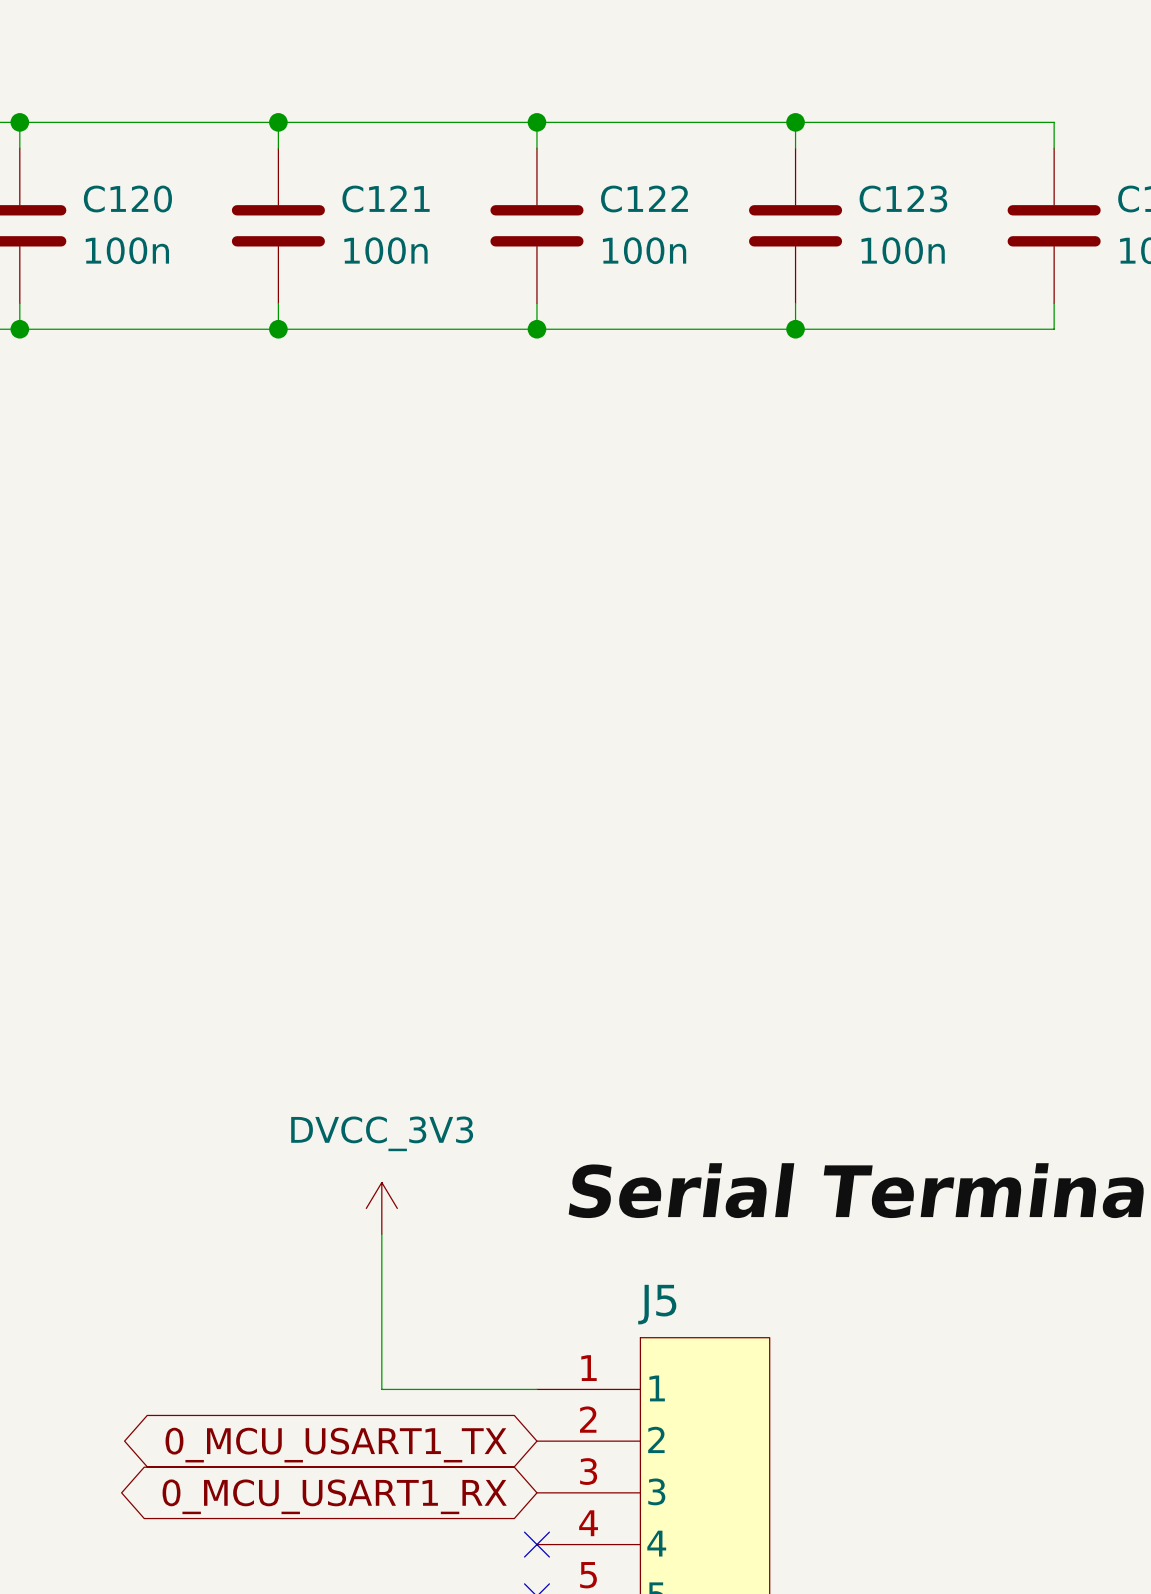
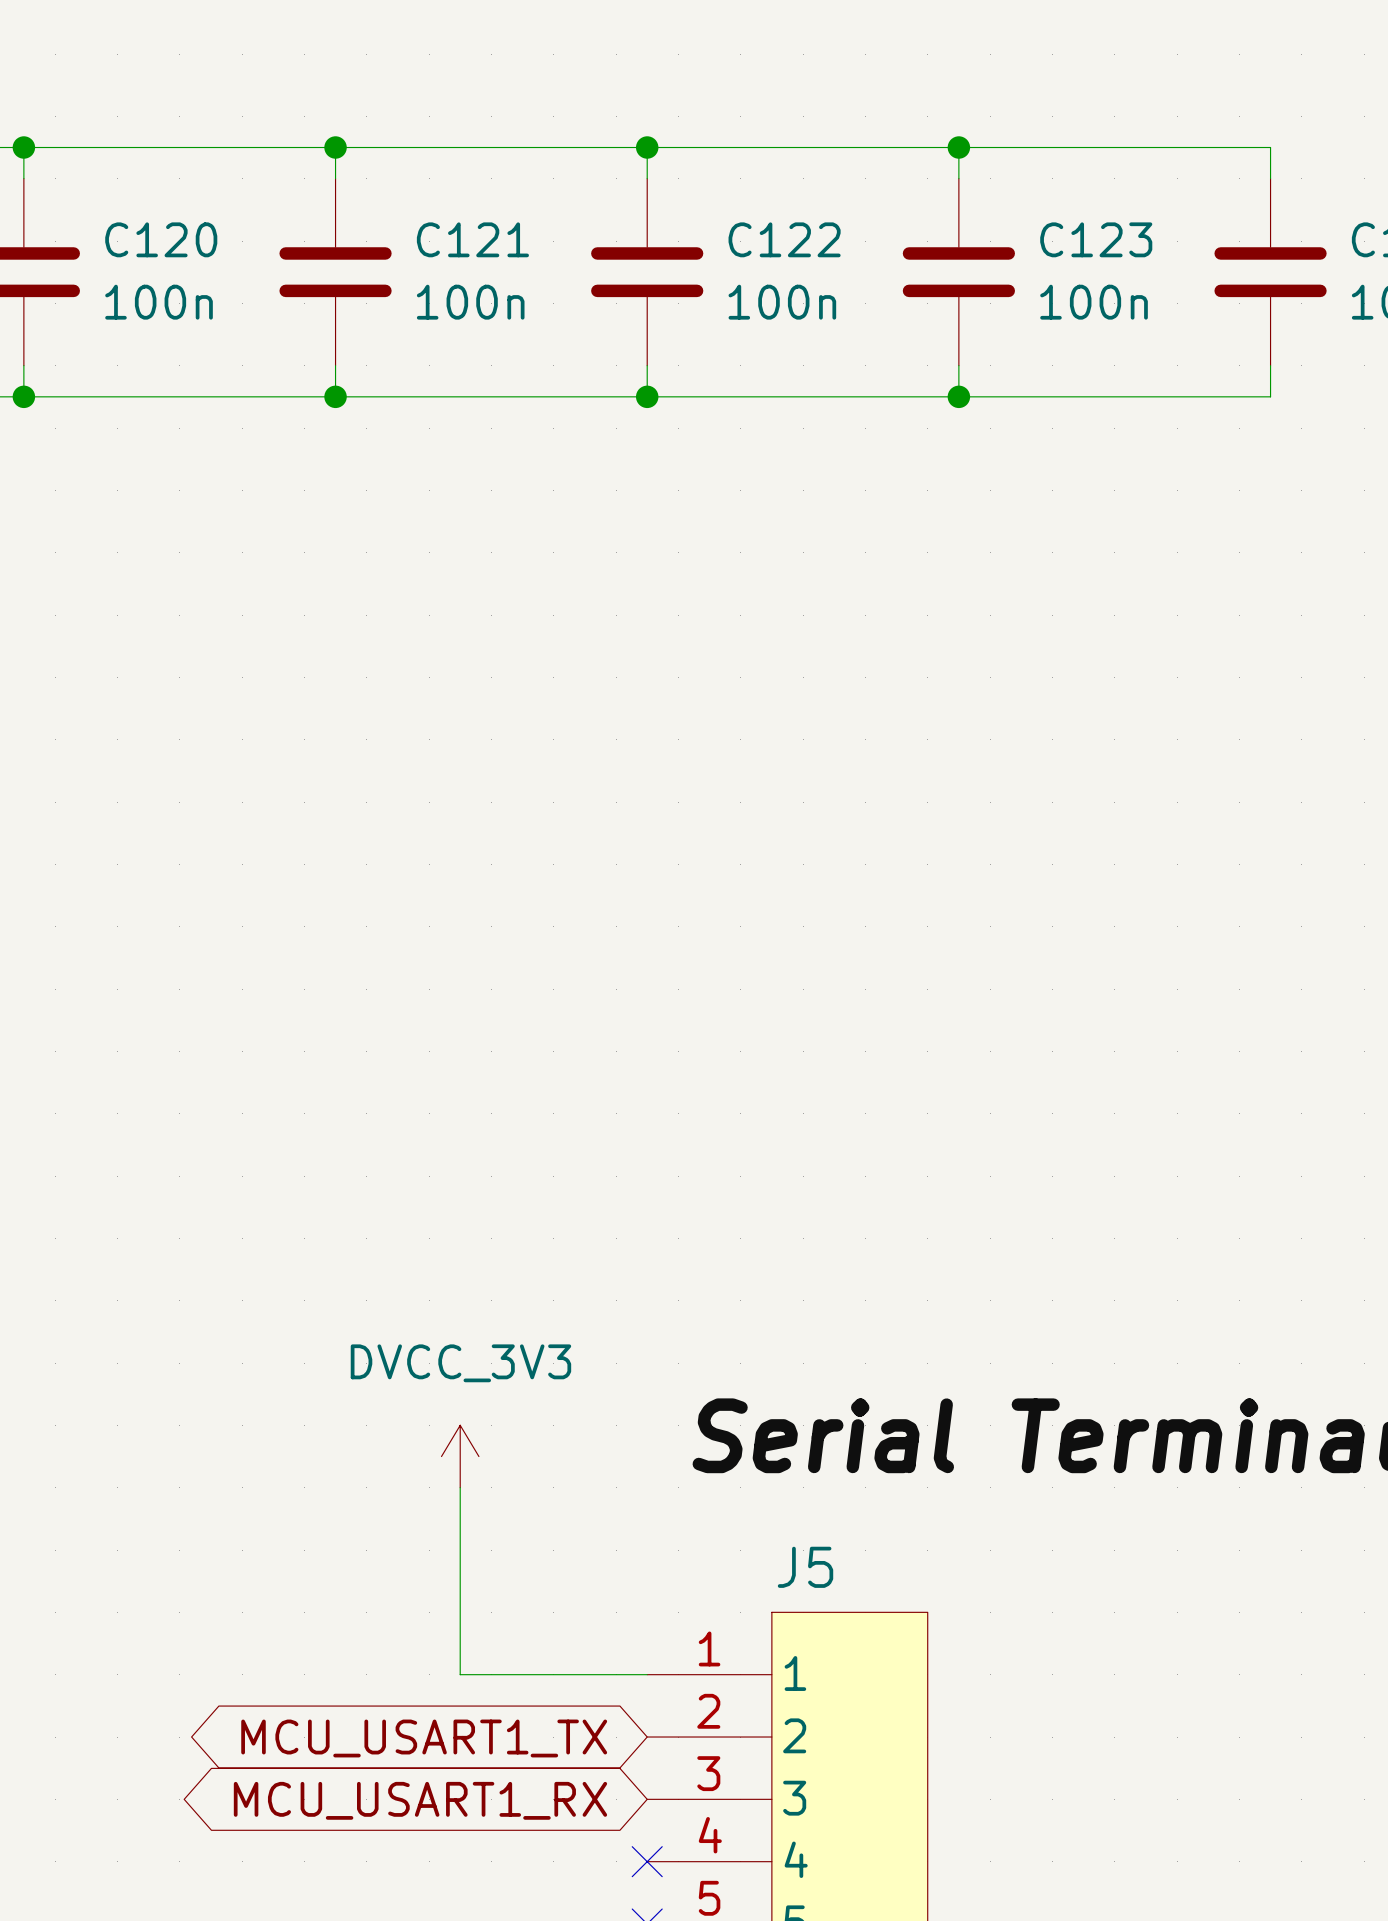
global label: 0_MCU_USART1_TX (336, 1445) -> MCU_USART1_TX (424, 1738)
global label: 0_MCU_USART1_RX (334, 1496) -> MCU_USART1_RX (420, 1800)

